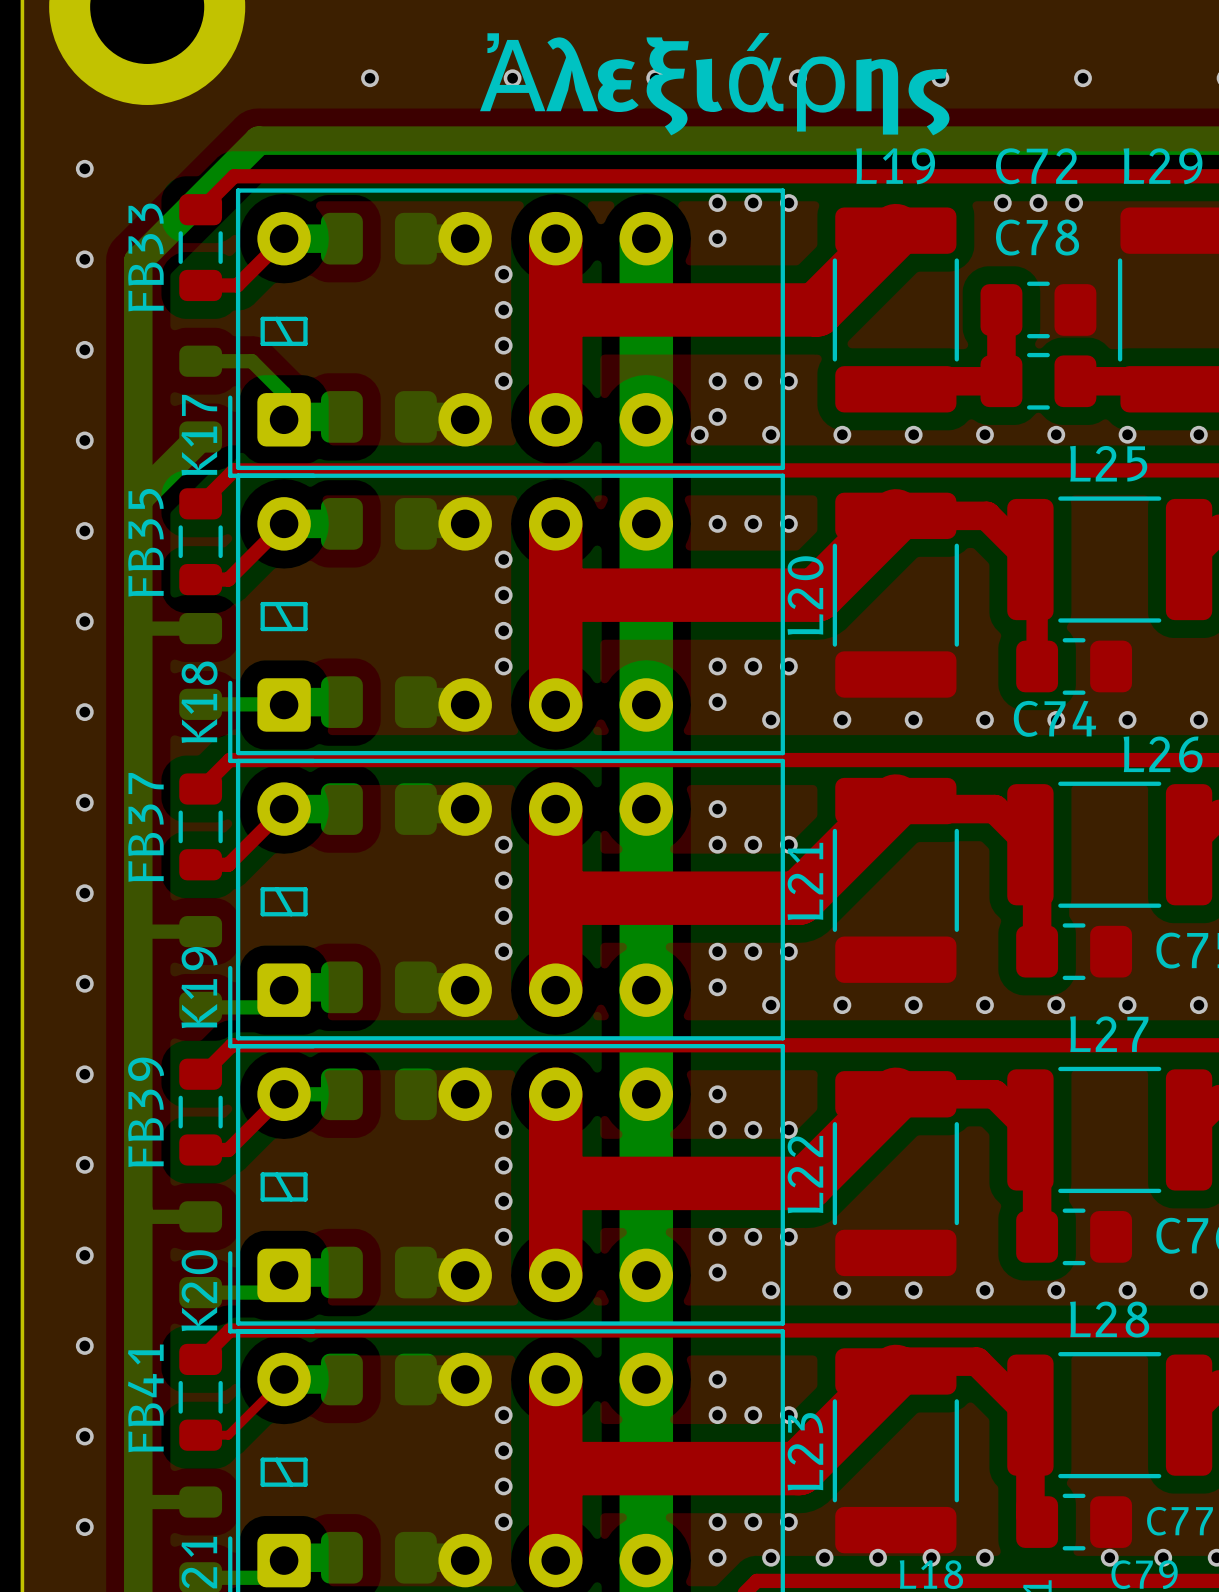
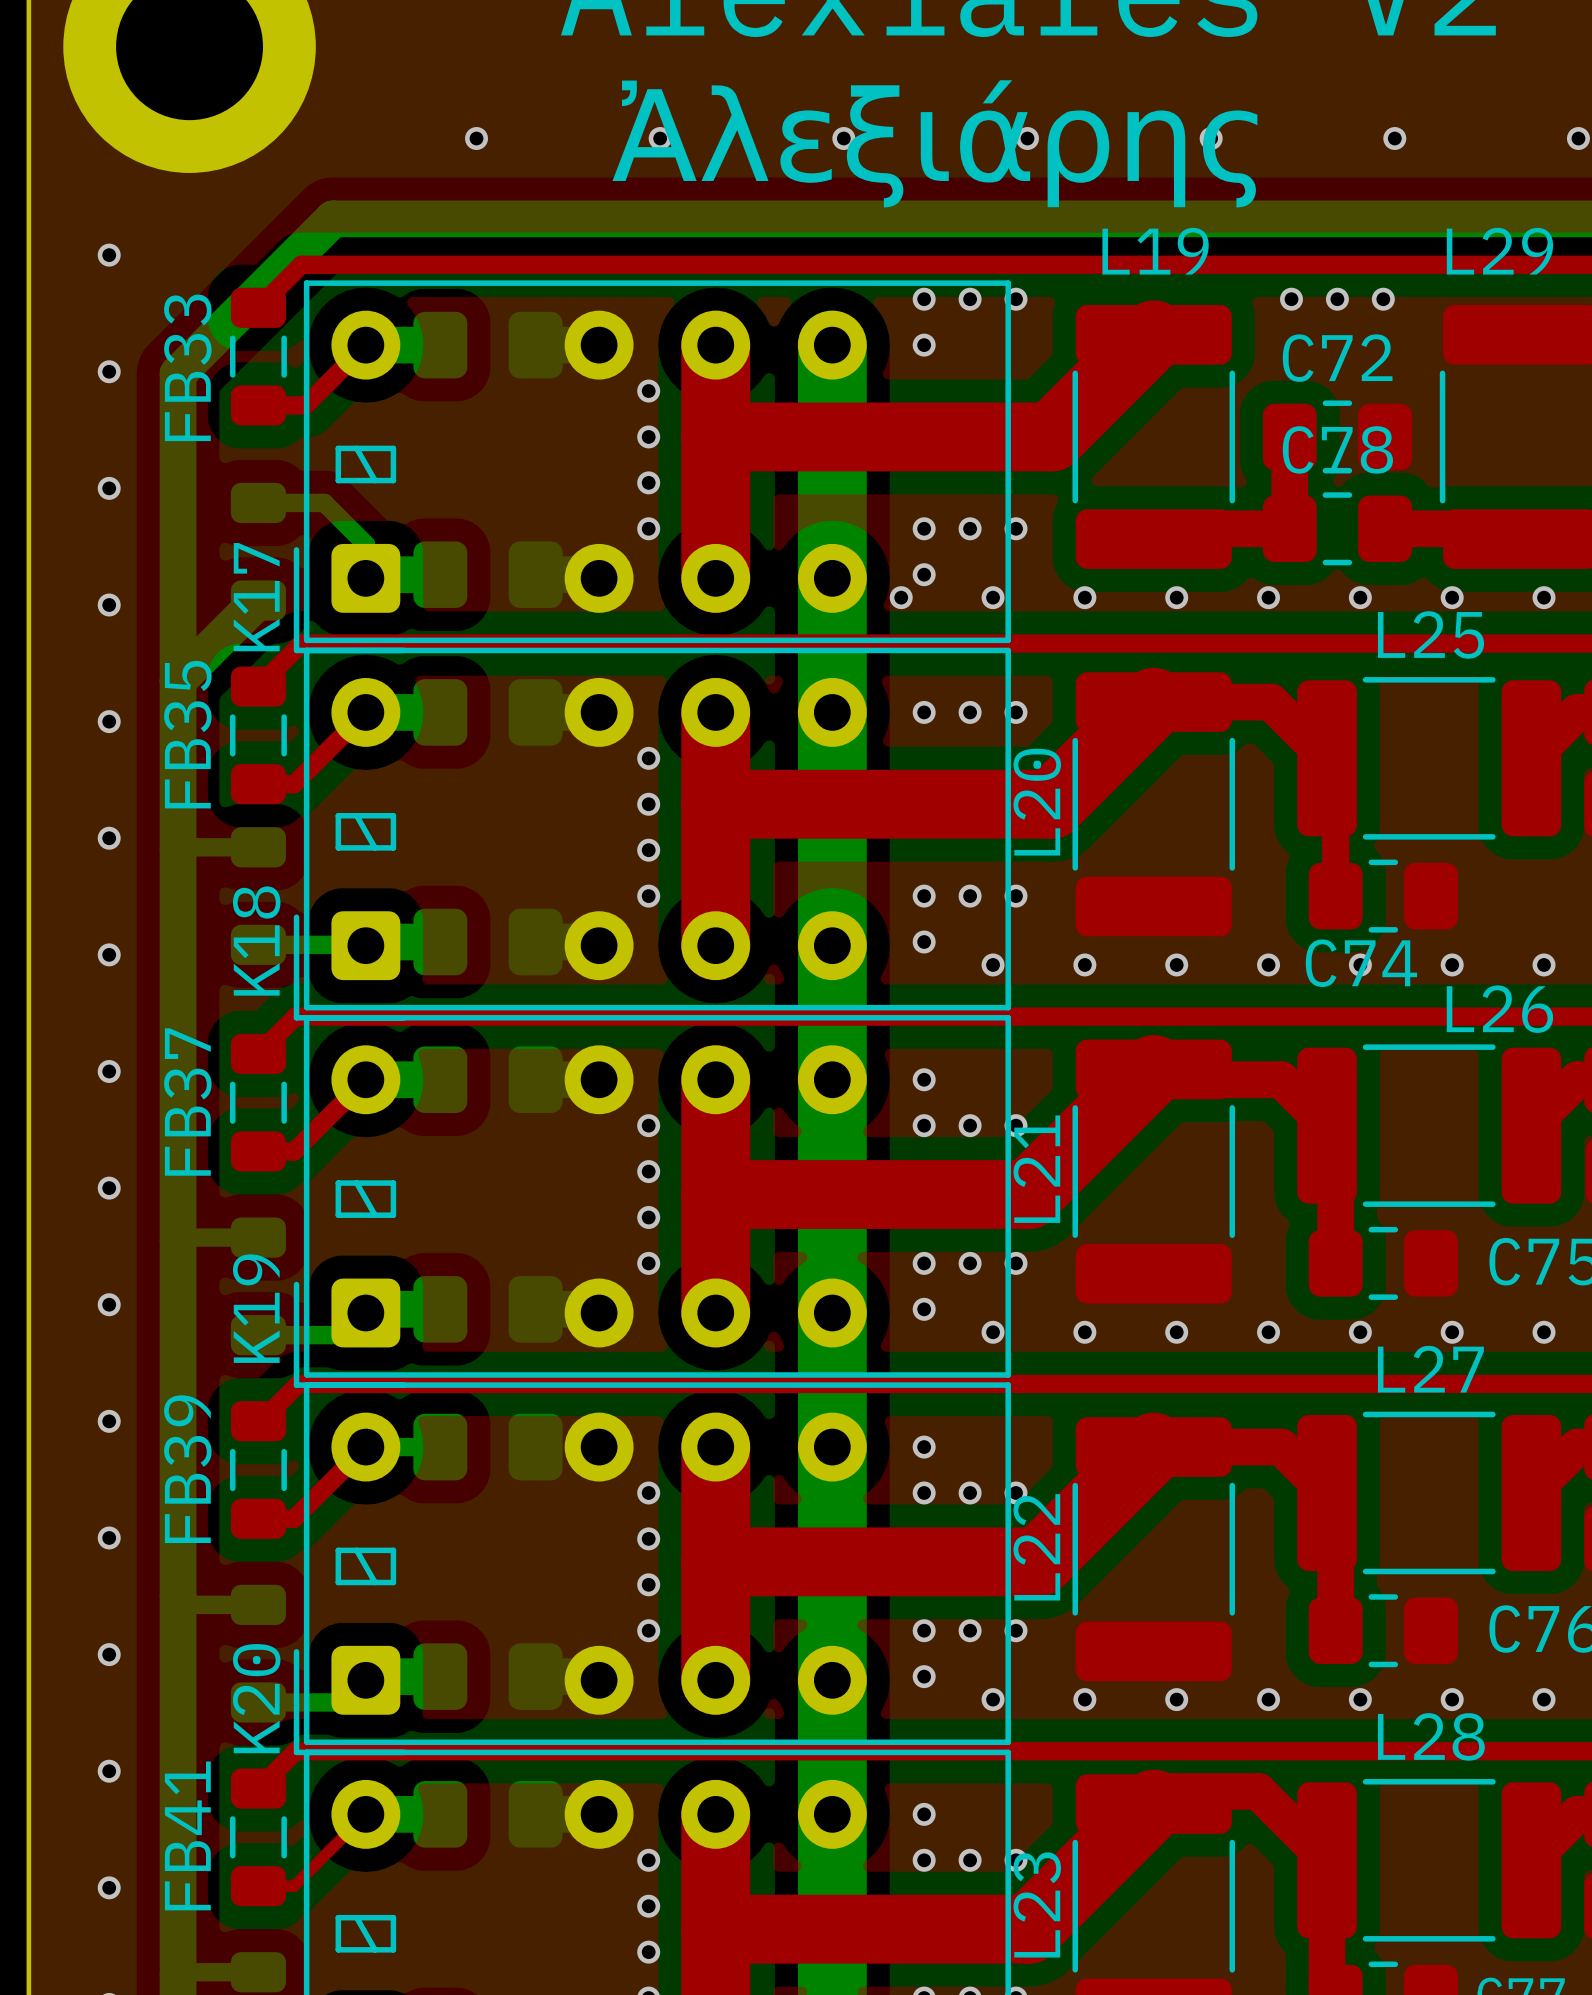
C72 name position: C72 (1036, 166) -> C72 (1337, 358)
C78 name position: C78 (1037, 237) -> C78 (1337, 449)

